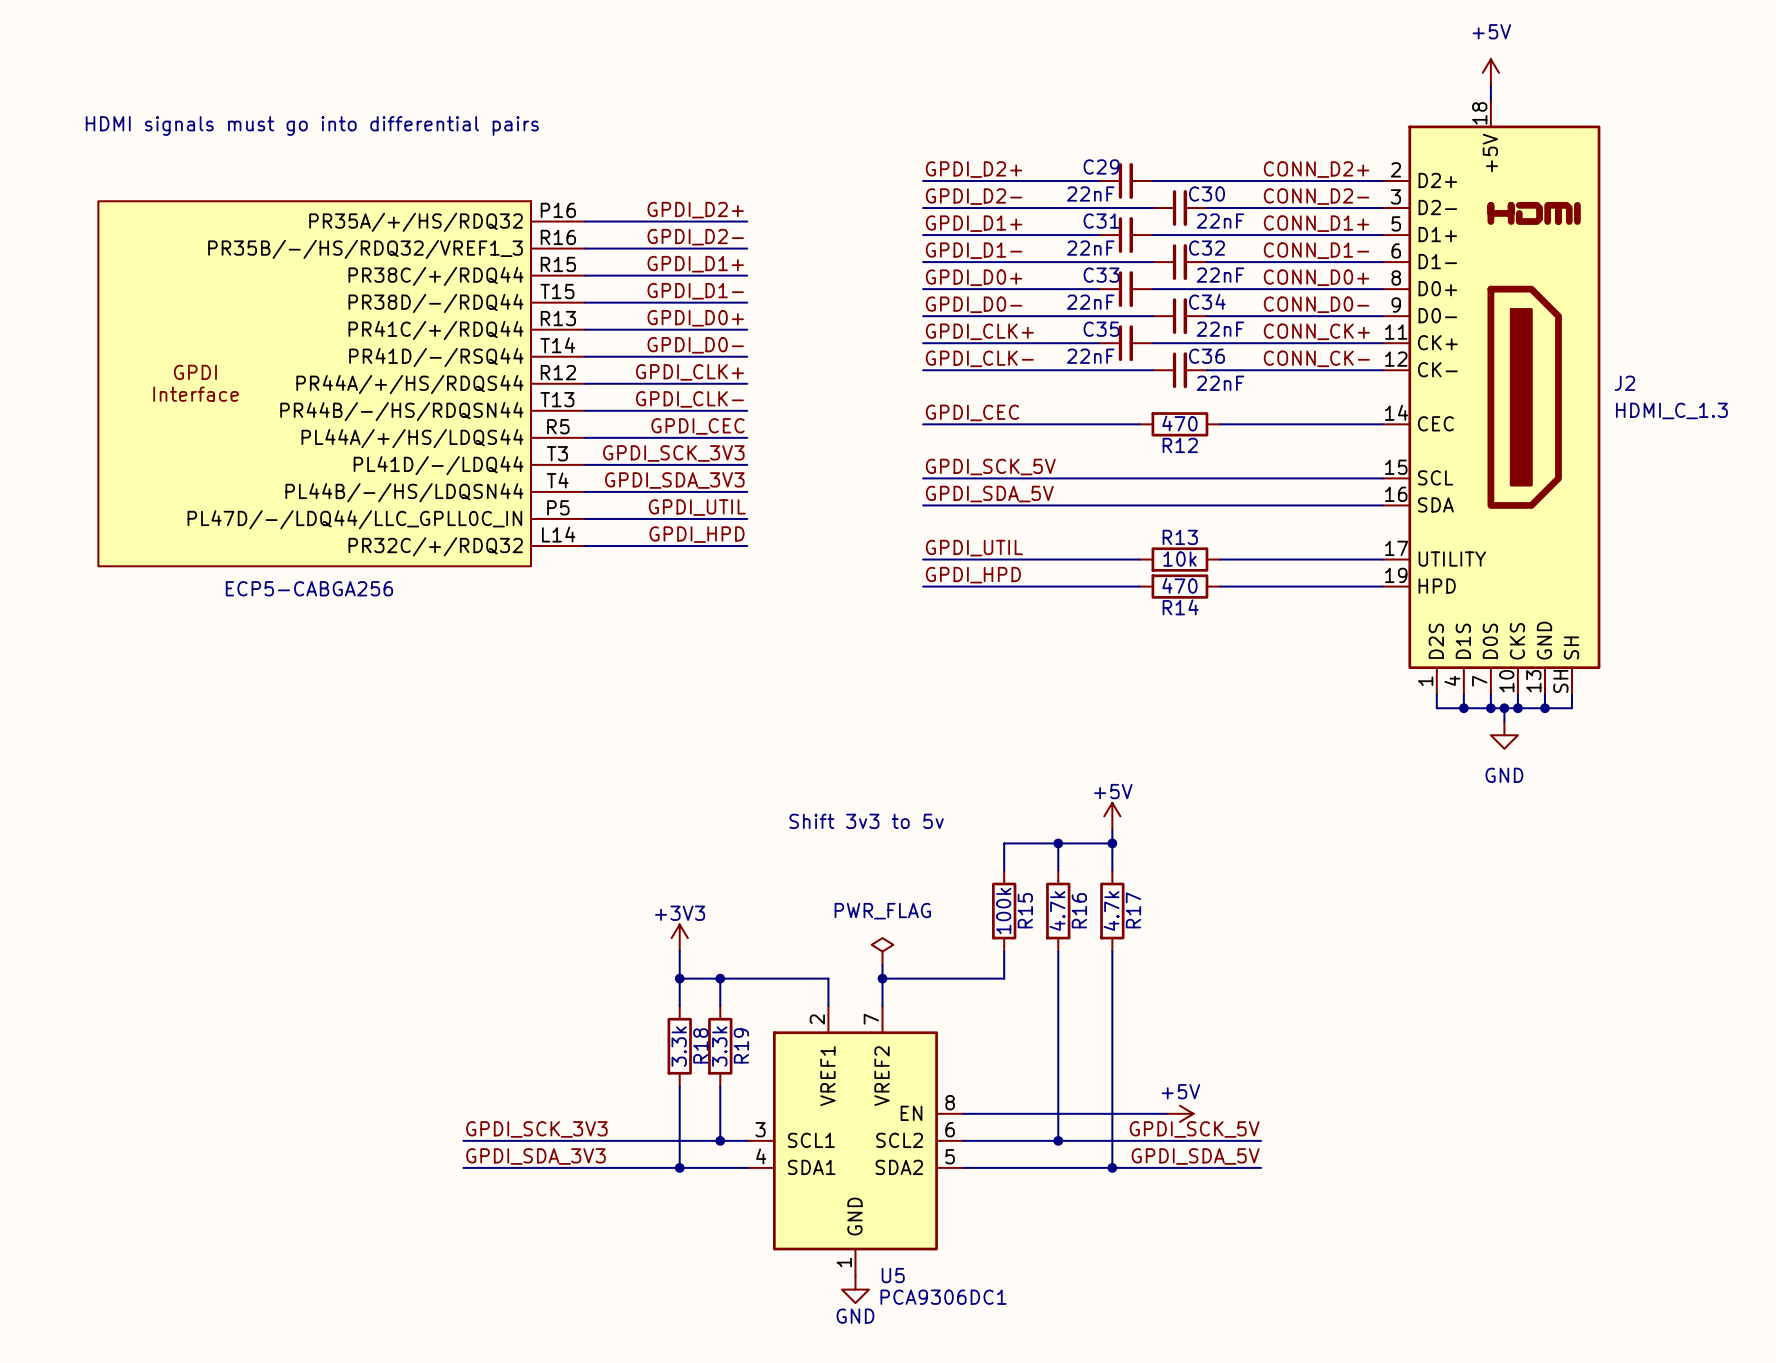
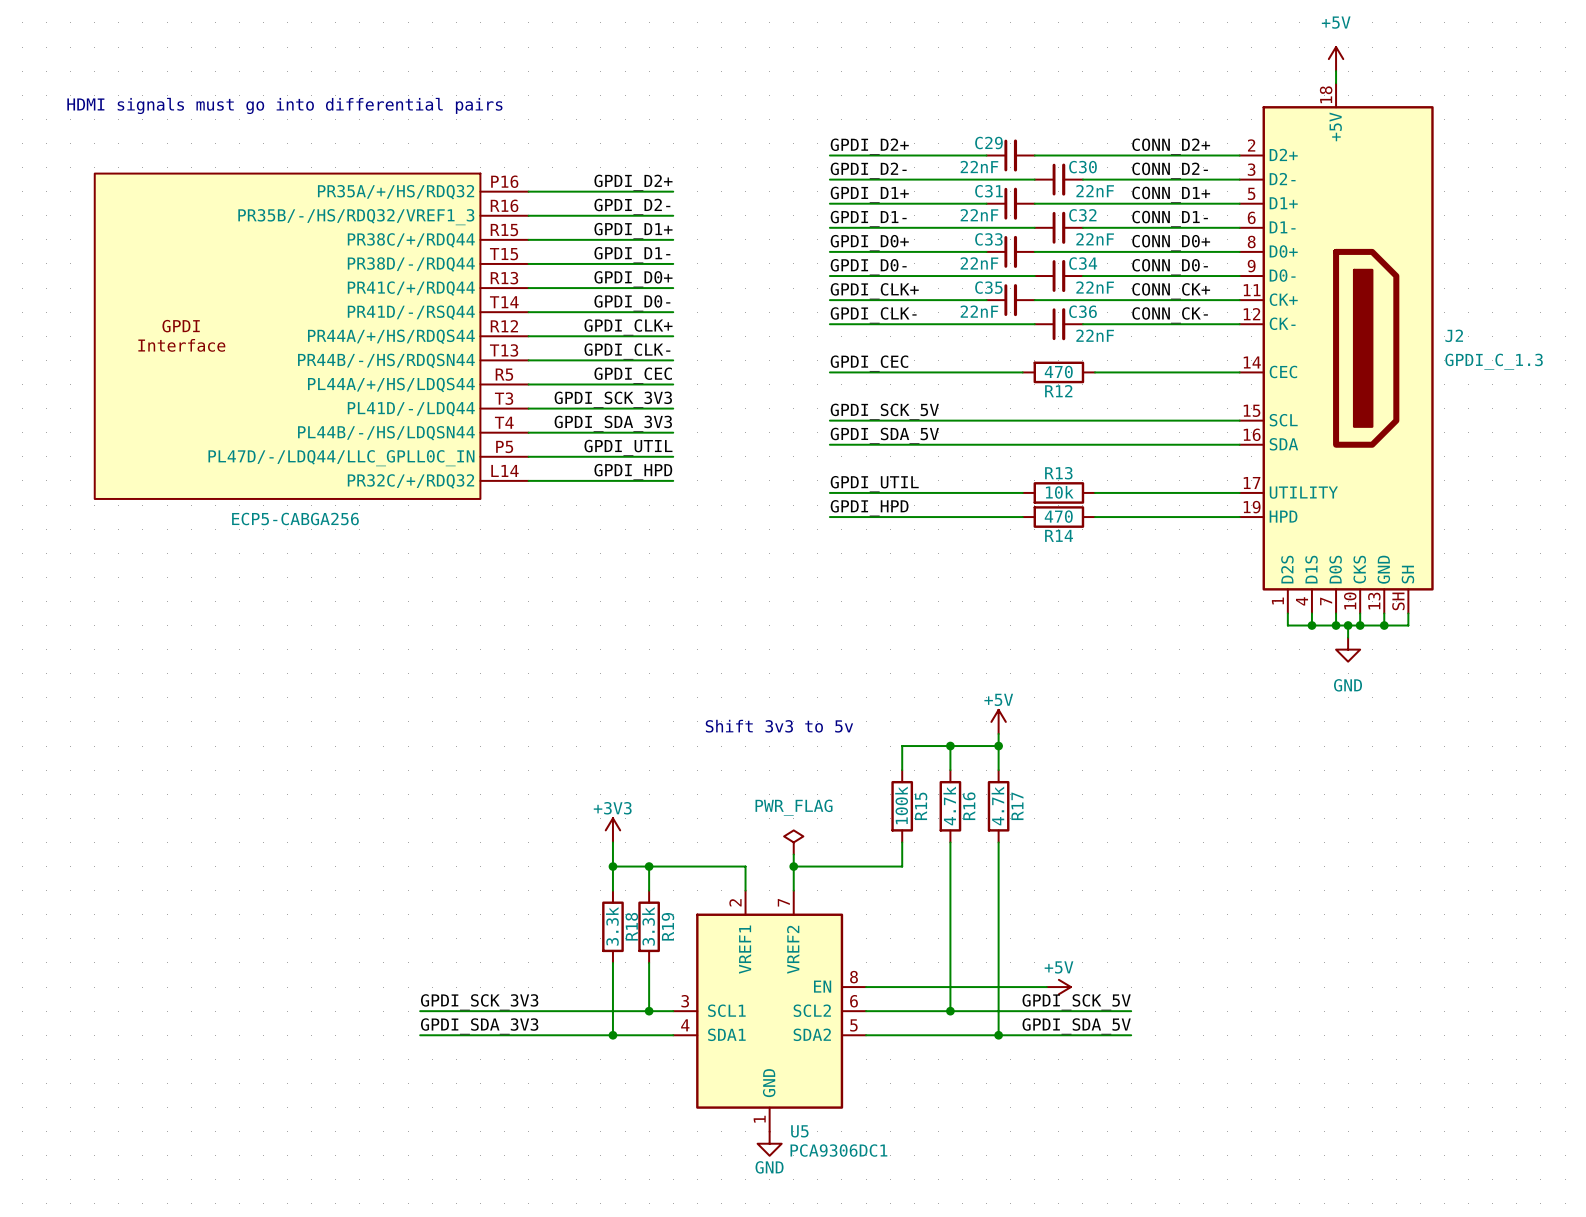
J2 symbol: [1382, 99, 1601, 695] -> [1239, 83, 1434, 614]
J2 value: HDMI_C_1.3 (1671, 410) -> GPDI_C_1.3 (1494, 361)

